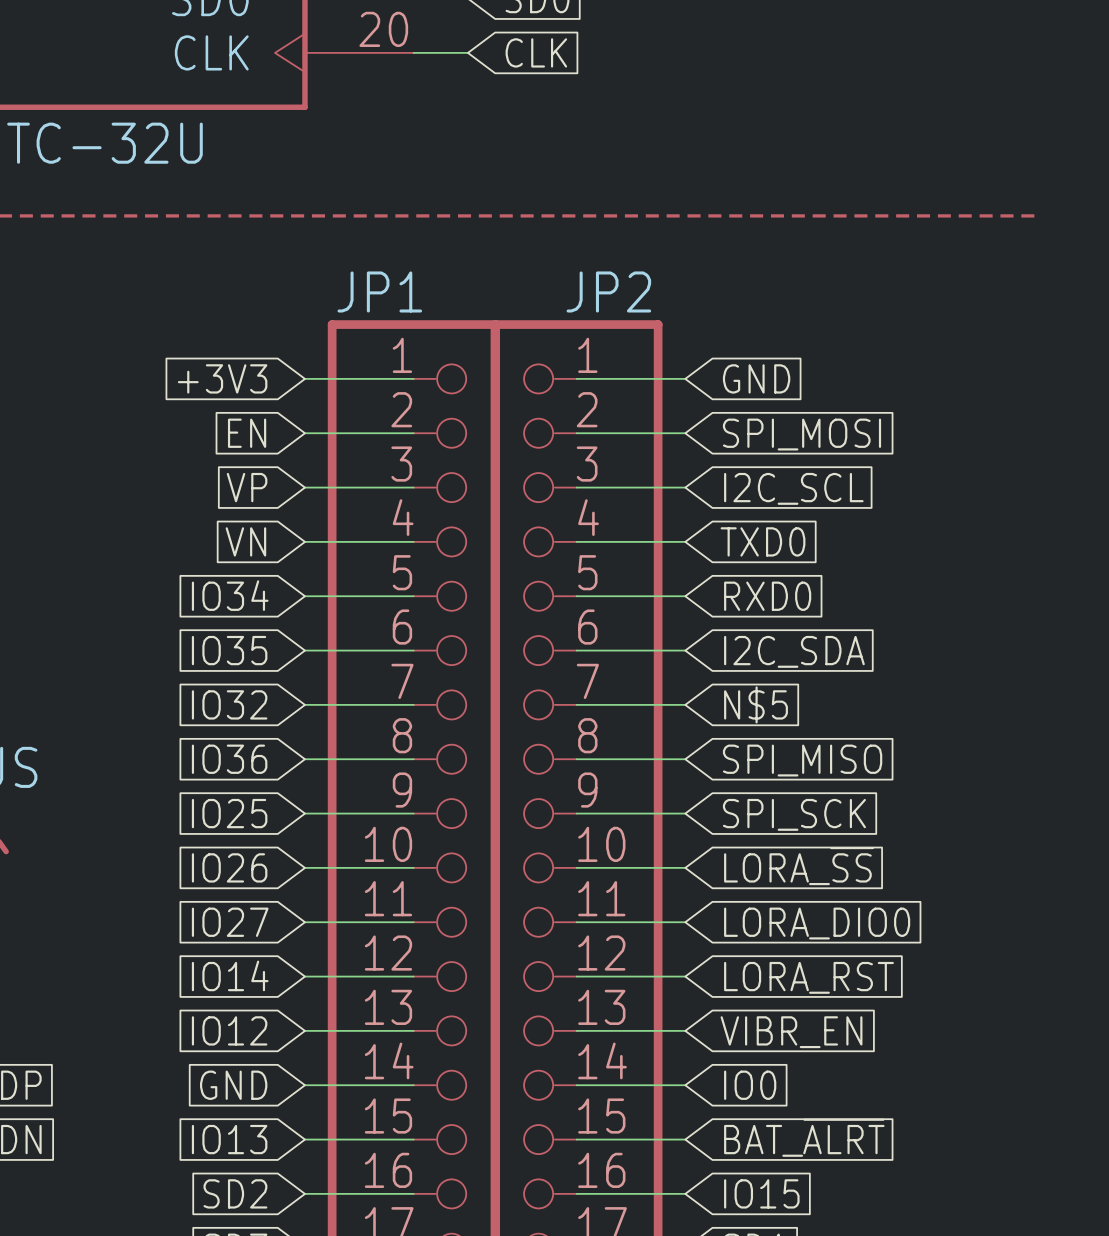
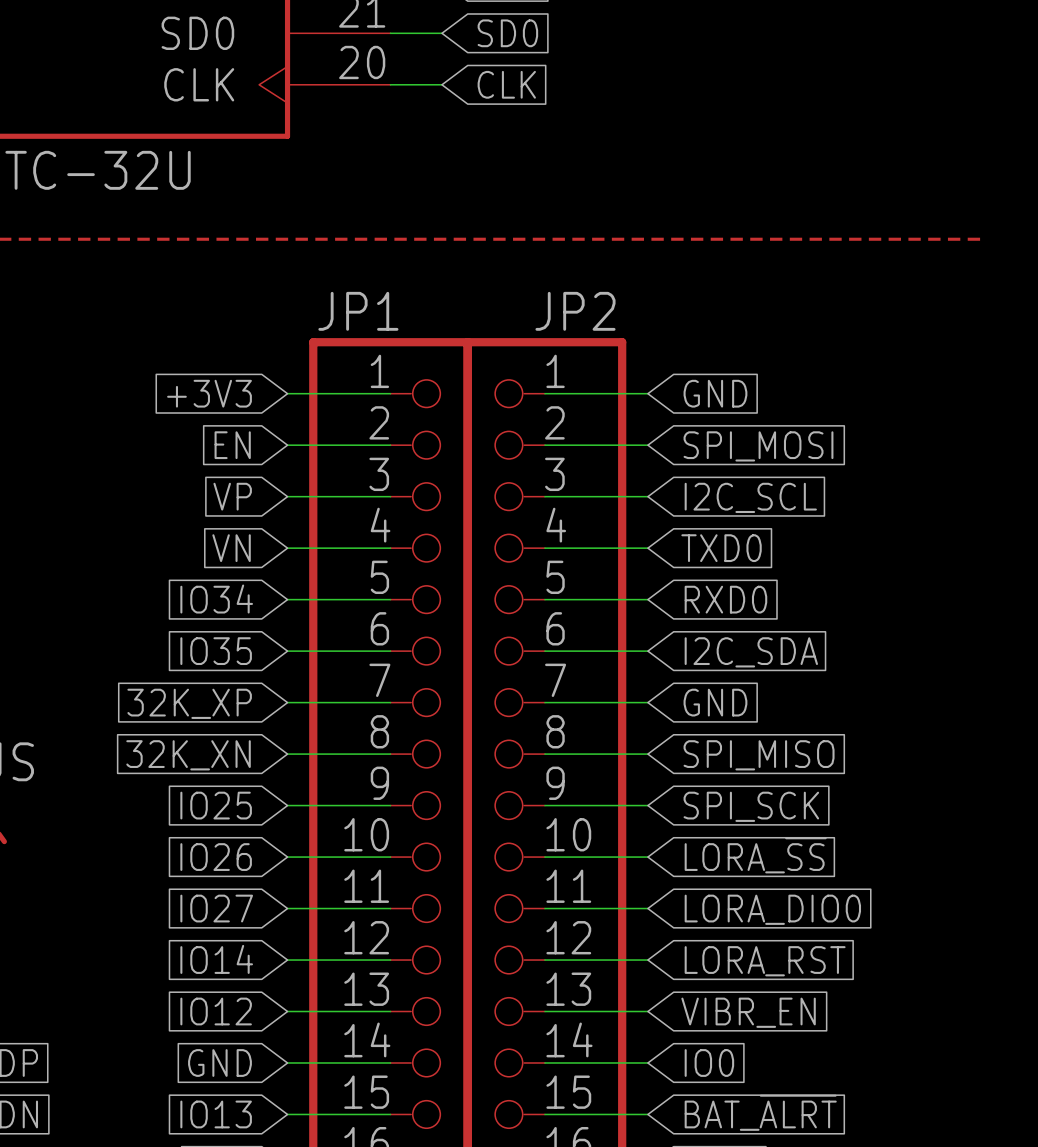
global label: IO32 (229, 704) -> 32K_XP (189, 703)
global label: N$5 (756, 704) -> GND (715, 702)
global label: IO36 (229, 759) -> 32K_XN (188, 755)

